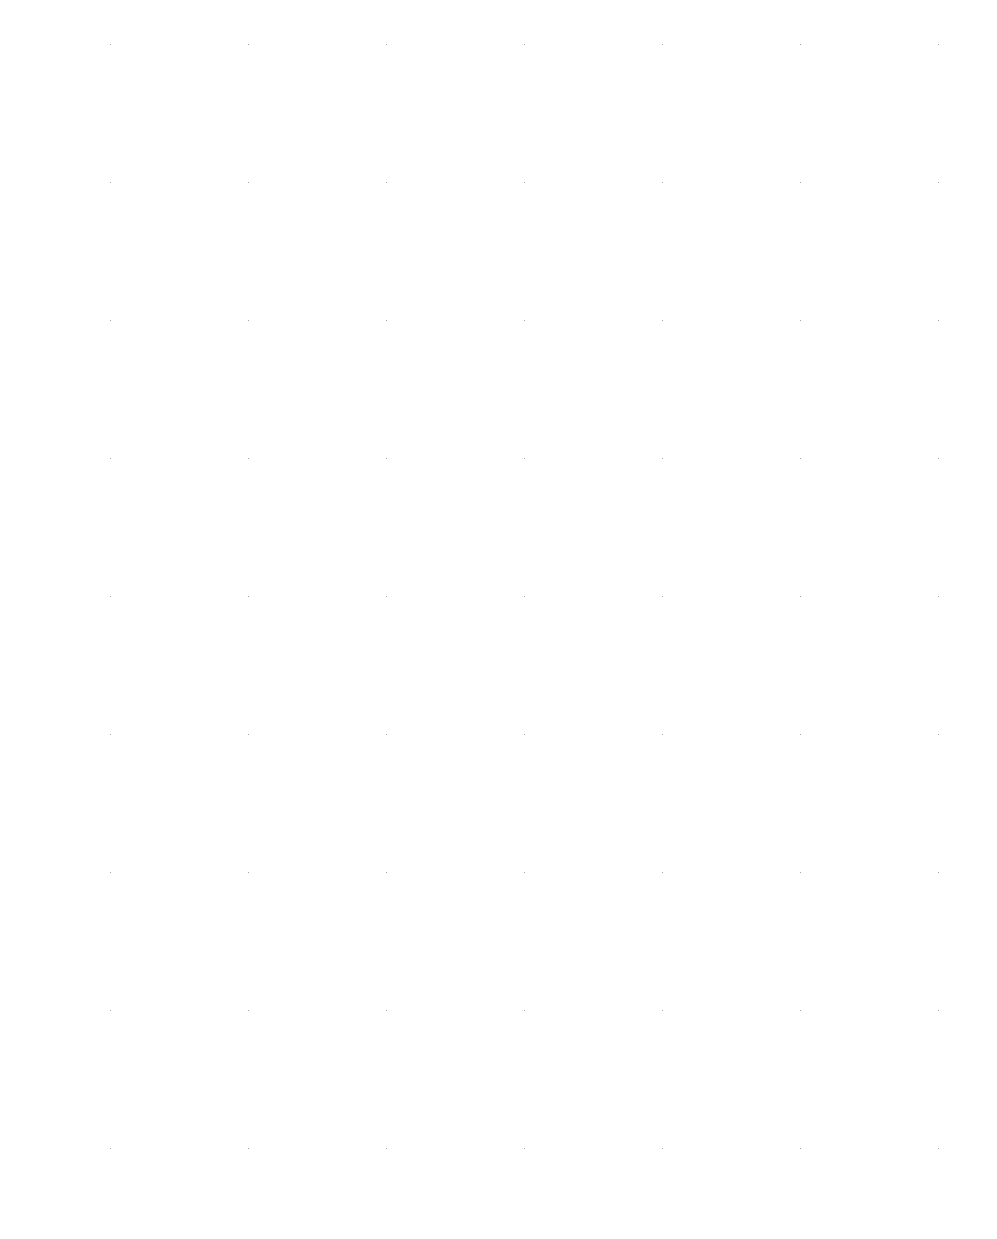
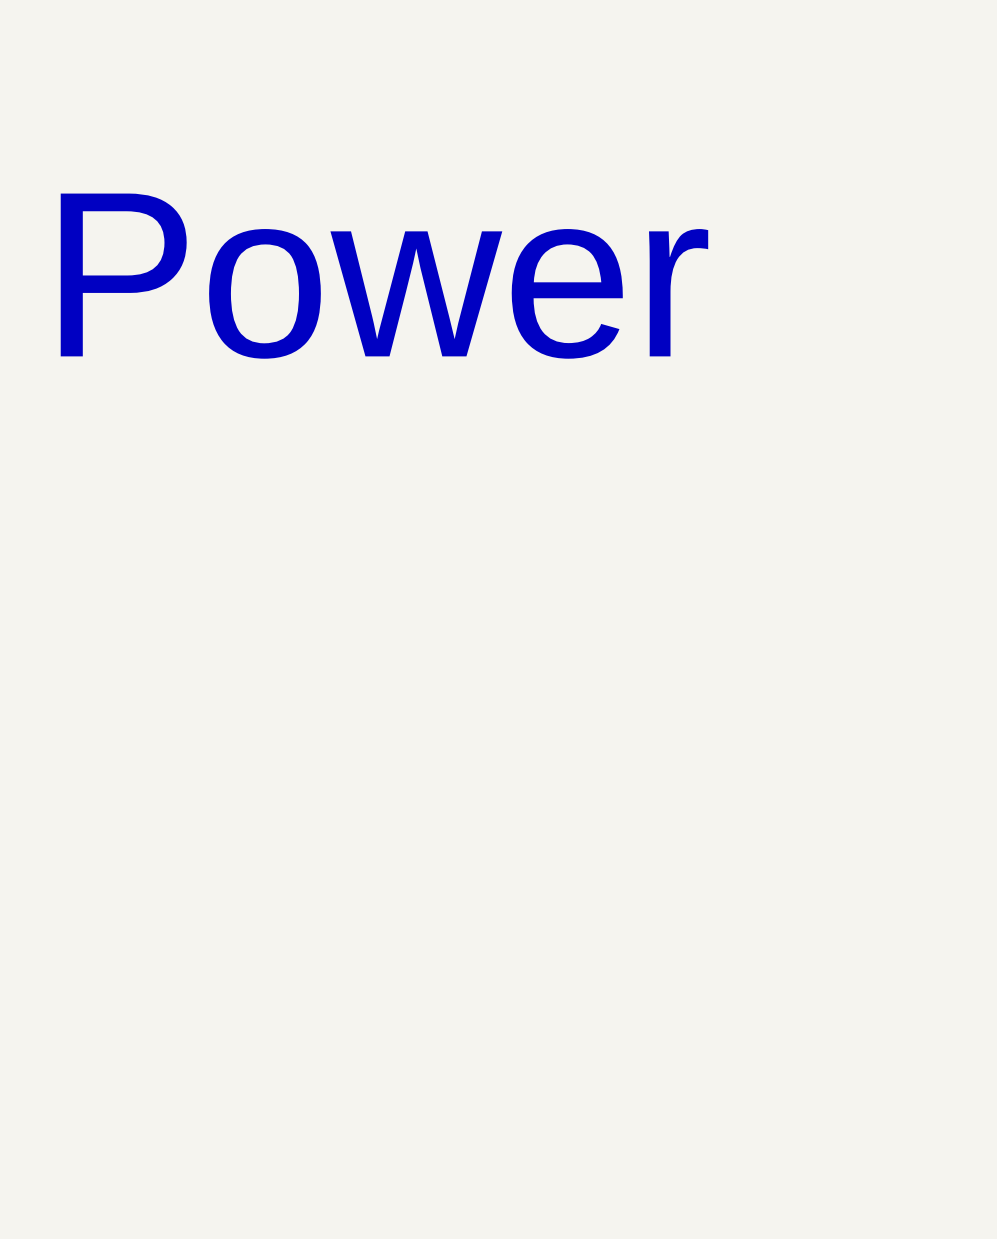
text: none -> Power (384, 276)

